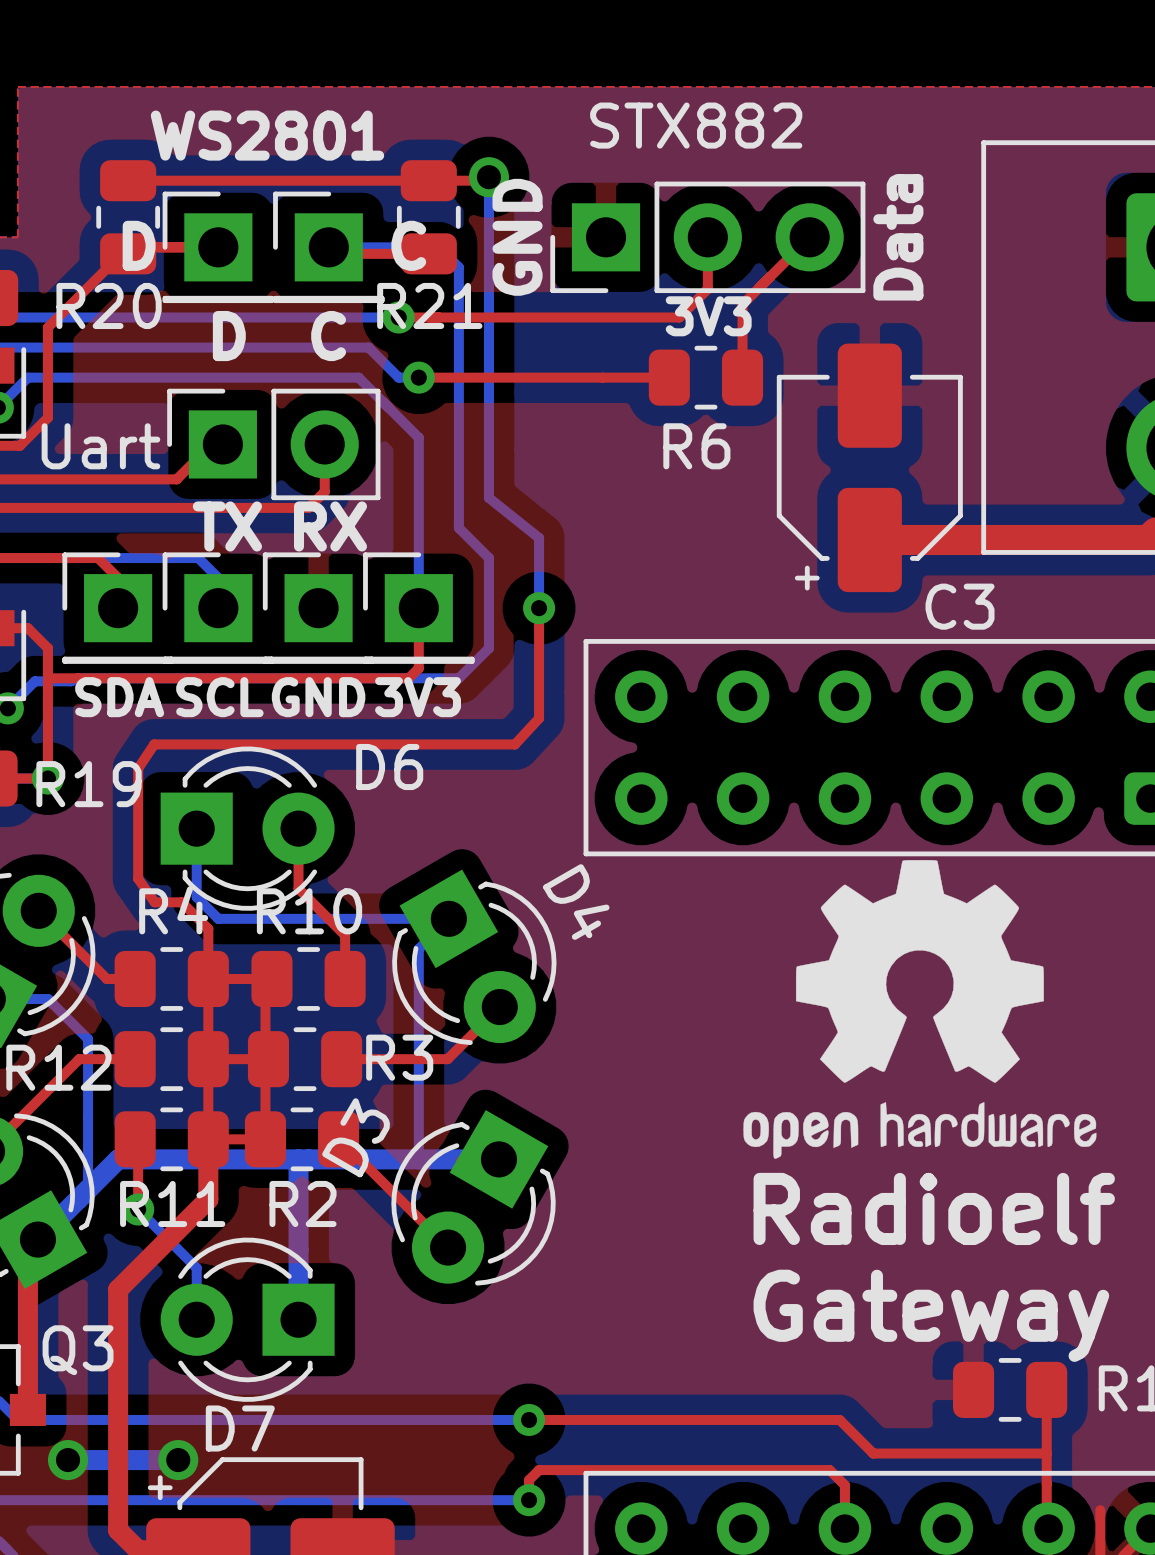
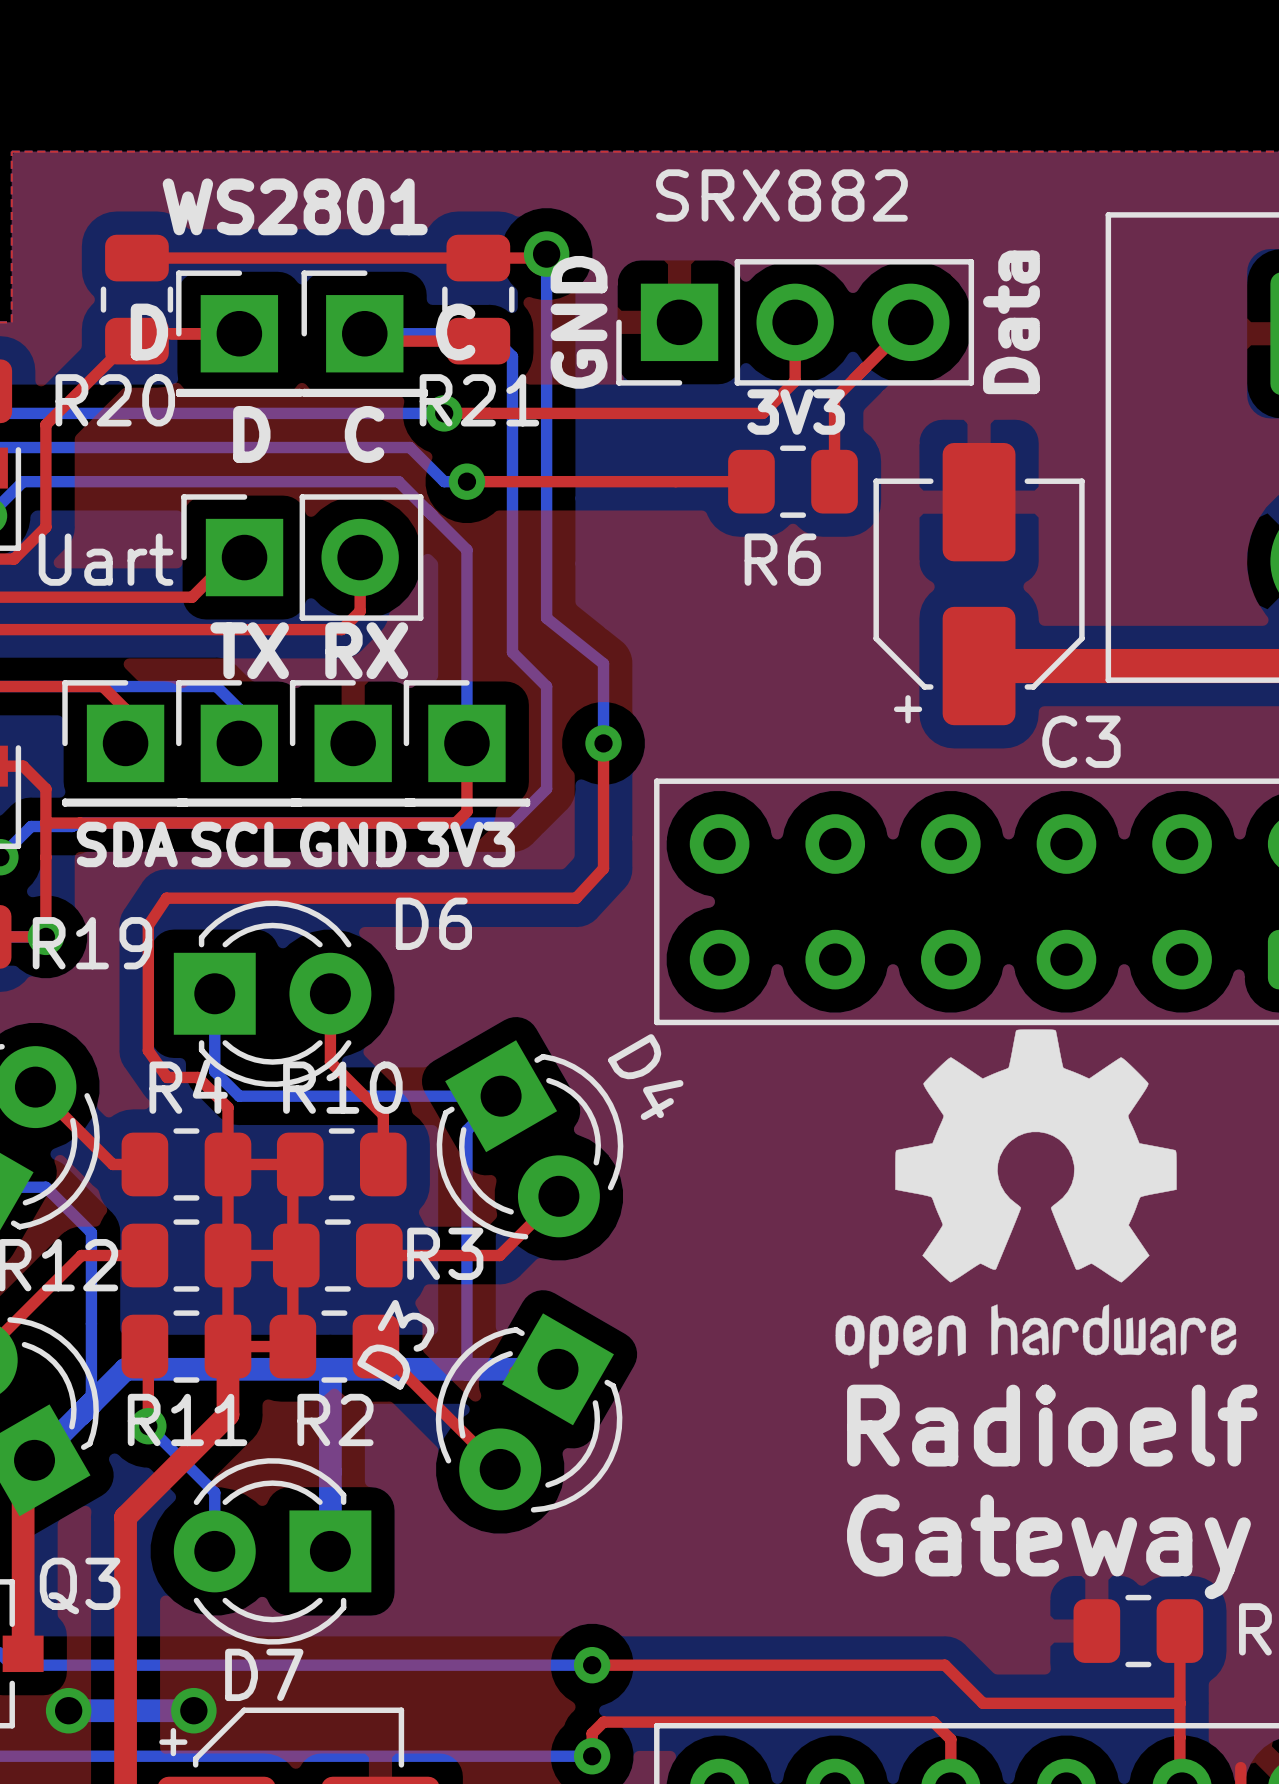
part value: STX882 (696, 125) -> SRX882 (781, 195)

